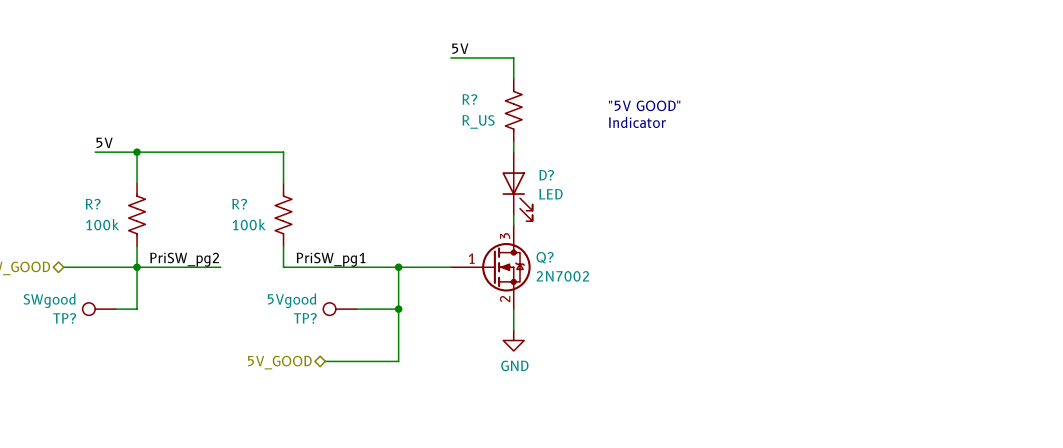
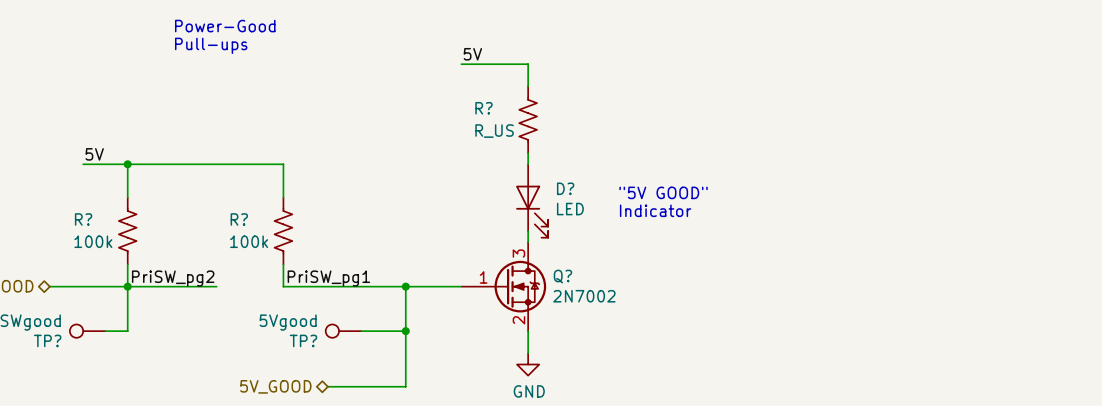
text: none -> Power-Good (225, 26)
text: none -> Pull-ups (211, 45)
text position: "5V GOOD" (644, 105) -> "5V GOOD" (663, 192)
text position: Indicator (637, 122) -> Indicator (655, 210)

